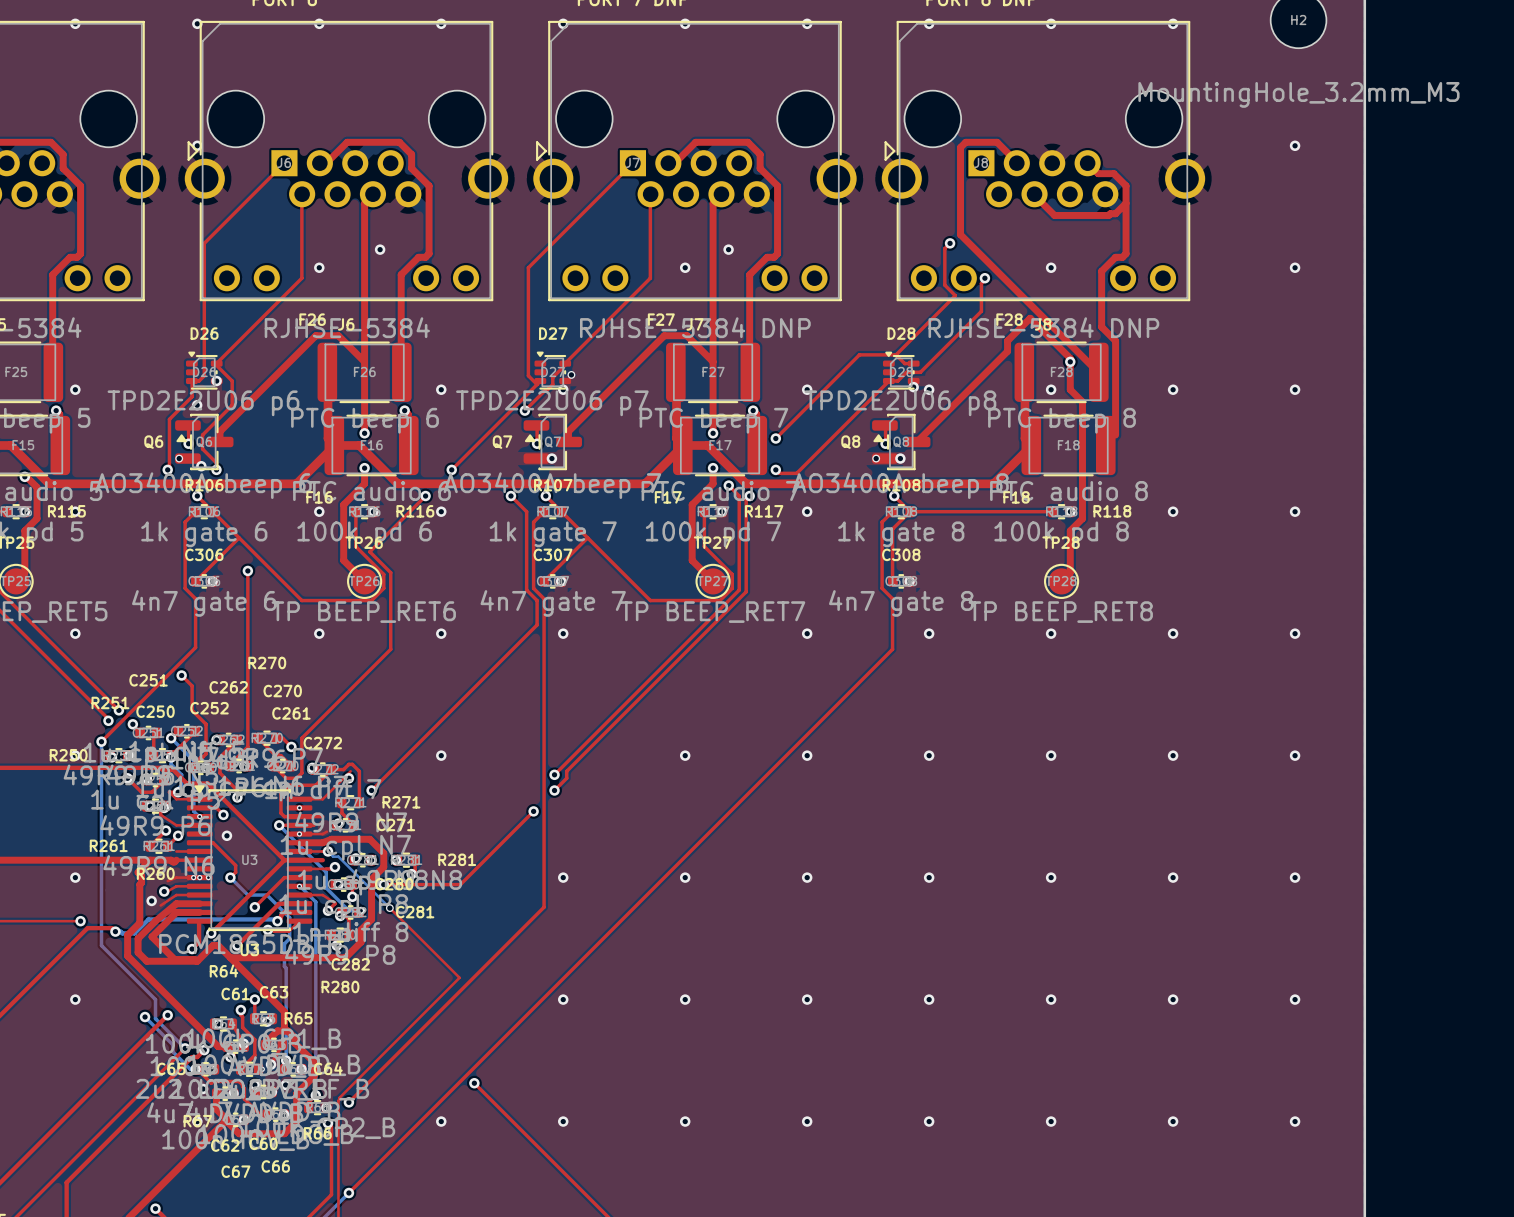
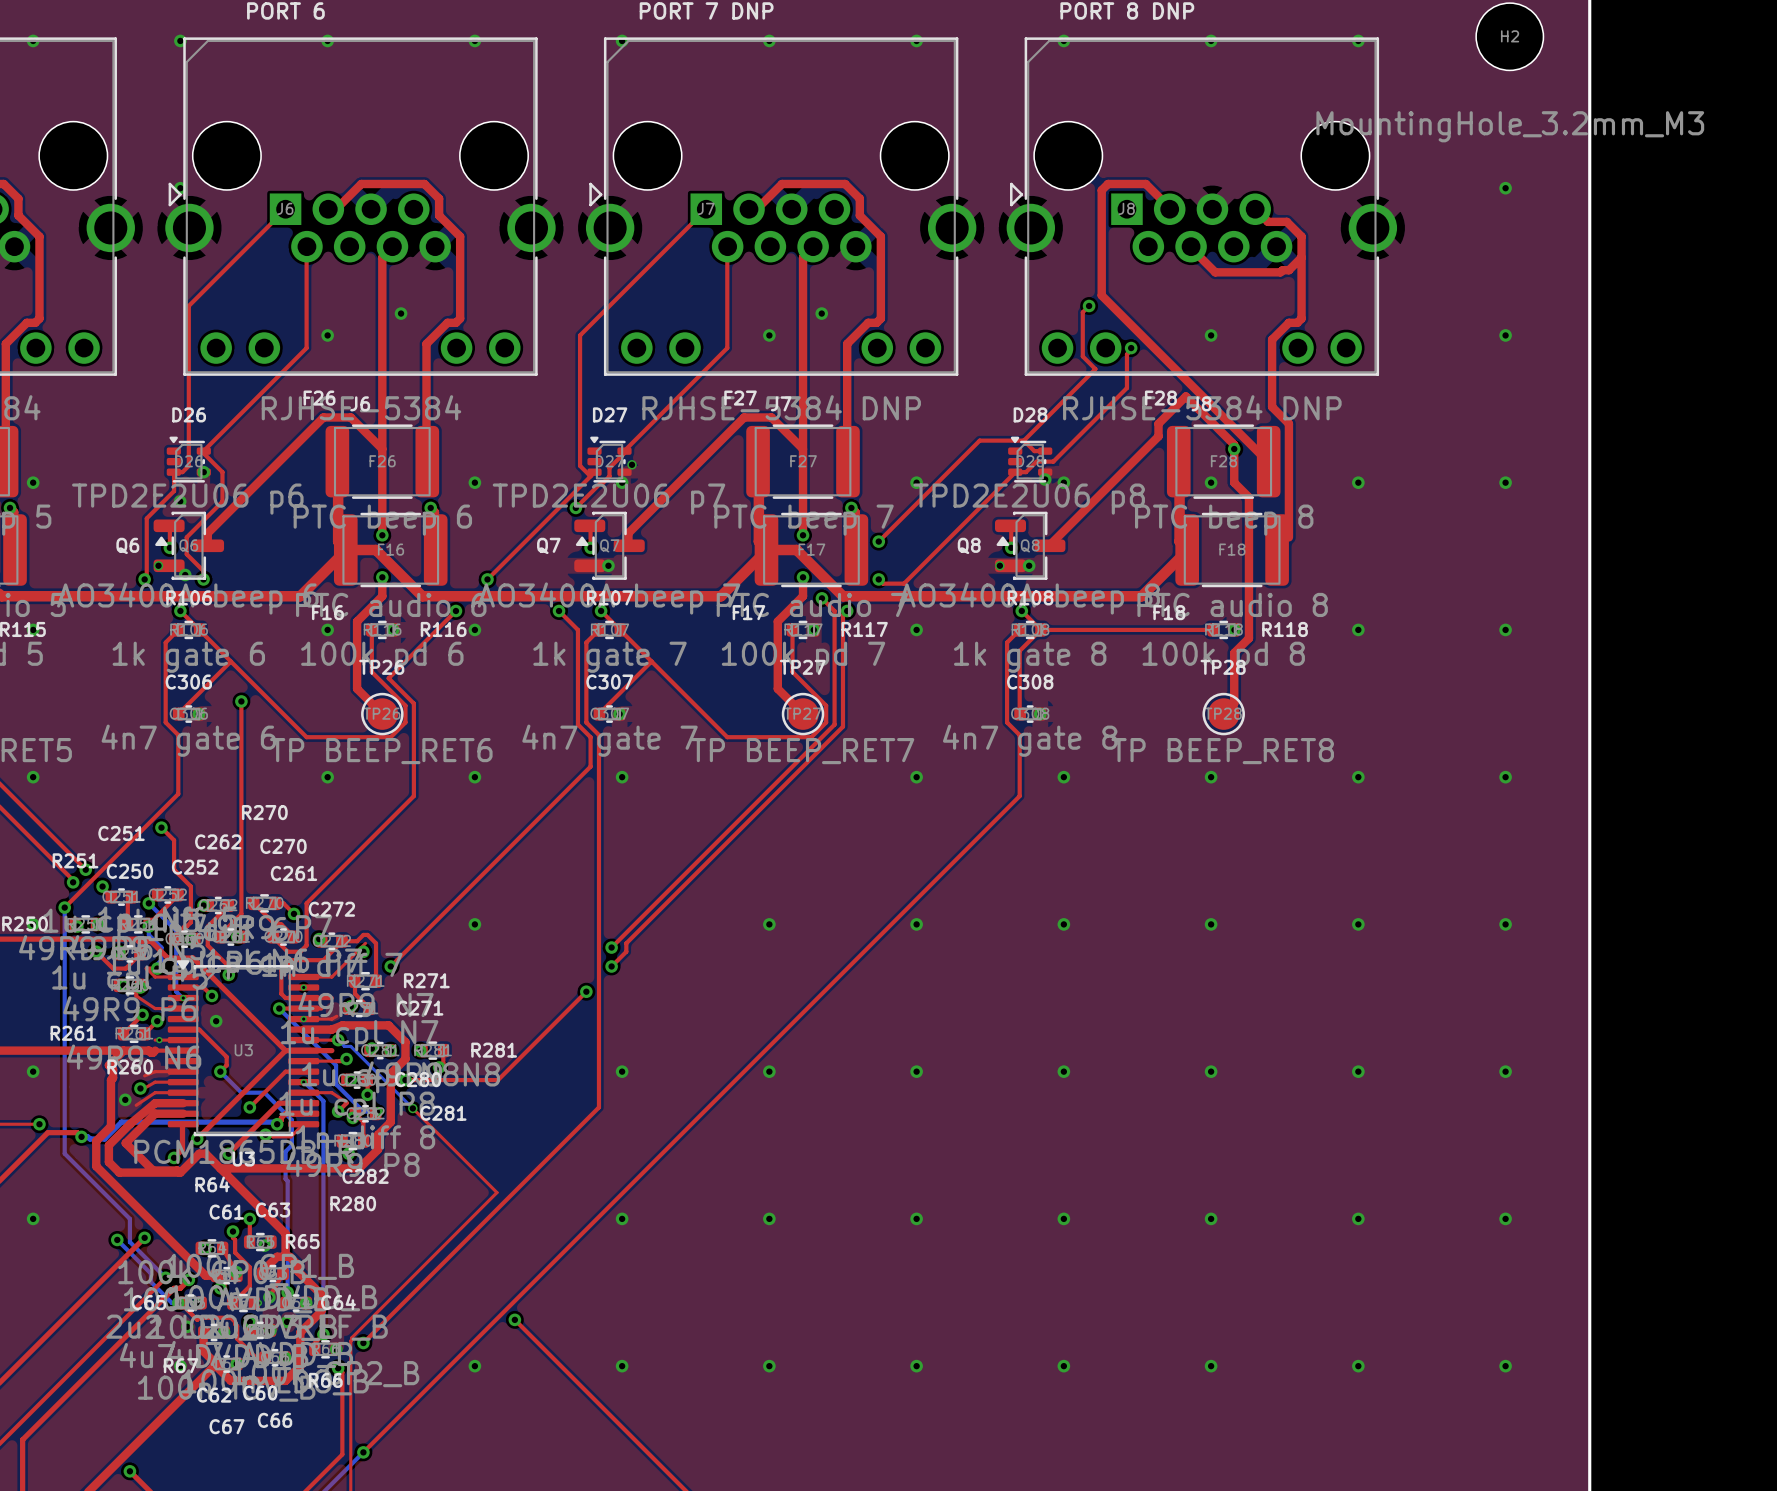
via: none -> (159, 1040)
via: (193, 877) -> none
via: (199, 877) -> none
via: (208, 877) -> none

